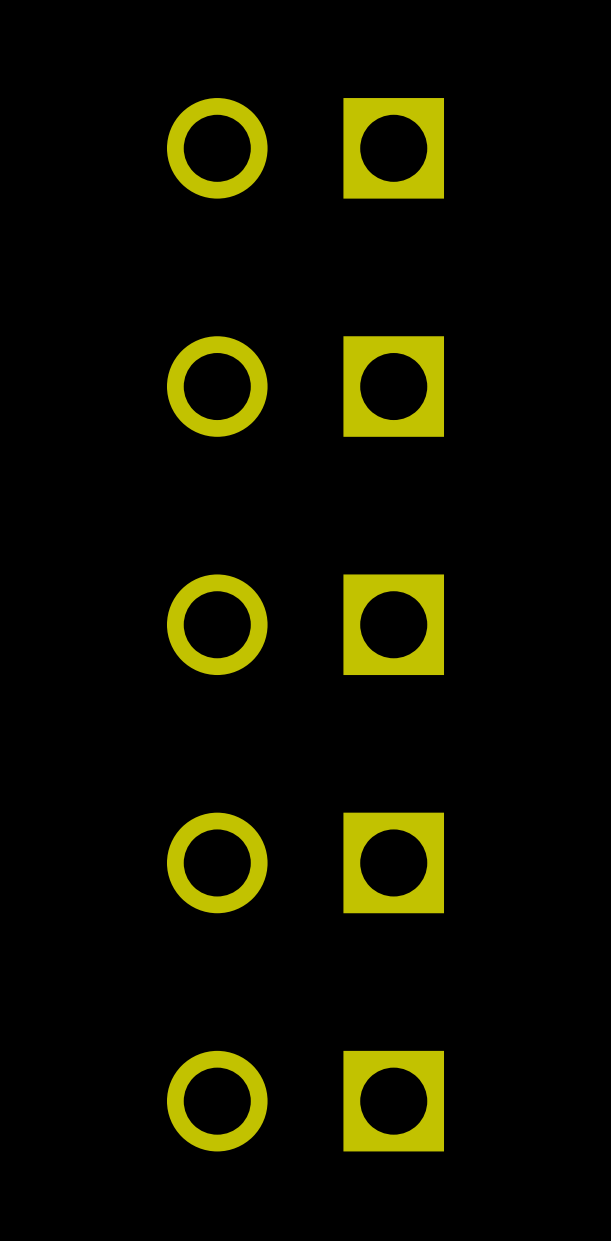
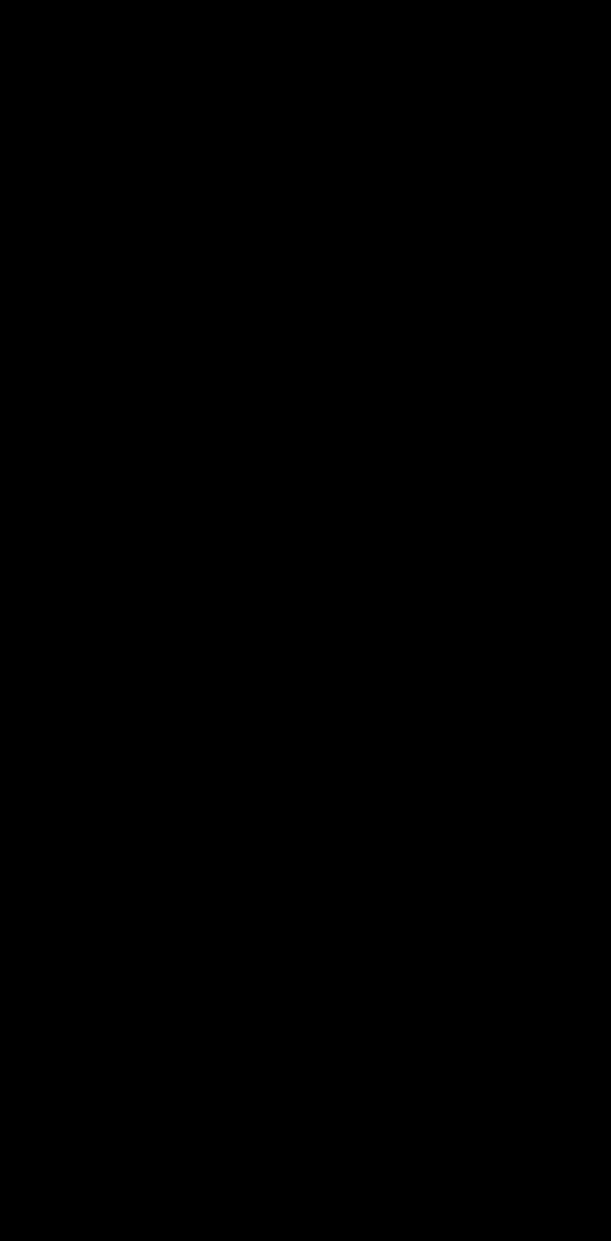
part: (305, 148) -> none
part: (305, 386) -> none
part: (305, 624) -> none
part: (305, 862) -> none
part: (305, 1101) -> none

